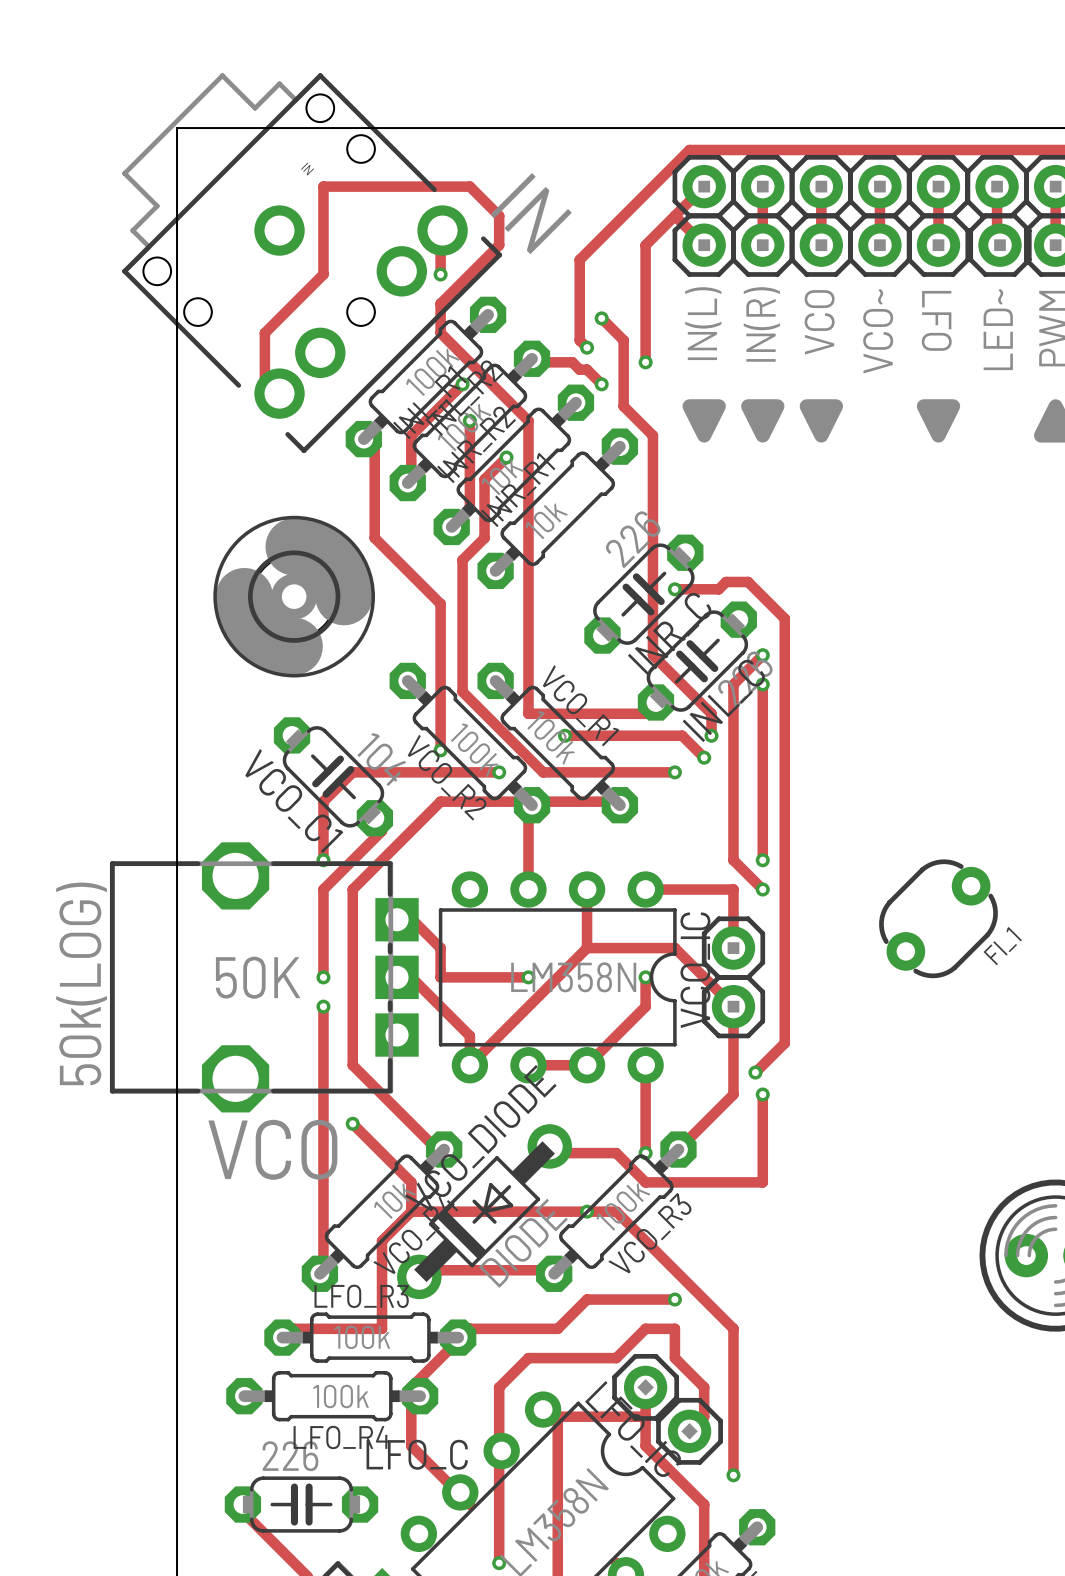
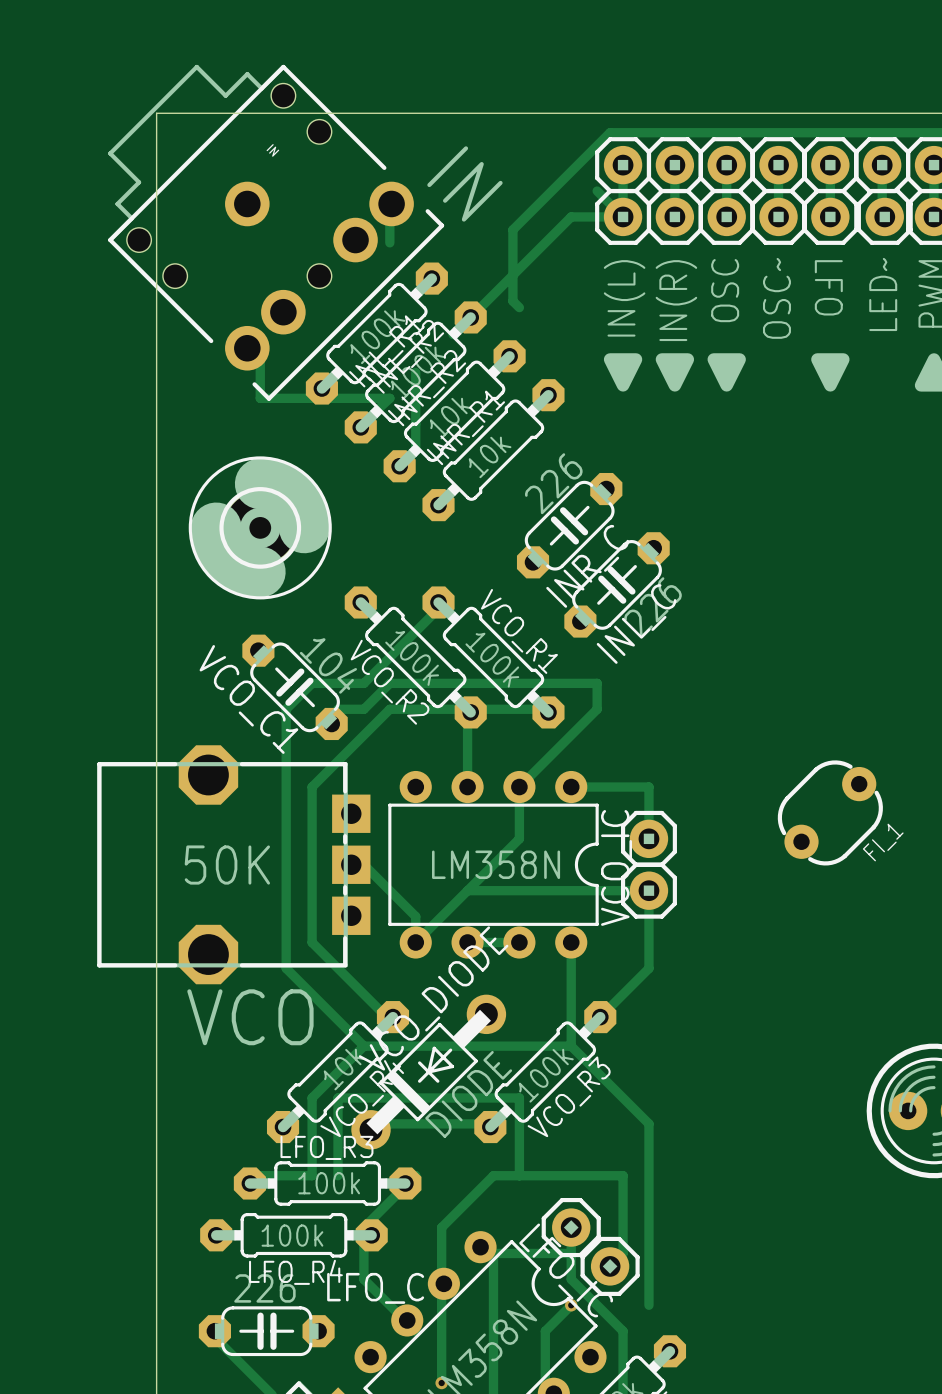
track: (704, 186) (645, 245) (645, 362) -> (623, 165) (623, 216) (571, 216) (452, 334)
via: (440, 274) -> none
track: (601, 318) (623, 340) (623, 406) (652, 435) (652, 655) (711, 713) (711, 735) -> none
via: (601, 318) -> none
part value: VCO (819, 322) -> OSC (725, 290)
part value: VCO~ (878, 331) -> OSC~ (776, 298)
via: (587, 347) -> none
track: (532, 358) (535, 362) (572, 362) (579, 369) (587, 369) (601, 384) -> none
via: (645, 362) -> none
track: (462, 384) (411, 435) (411, 479) (407, 483) -> none
via: (462, 384) -> none
via: (601, 384) -> none
track: (279, 393) (264, 391) (264, 333) (323, 274) (323, 186) (469, 186) (499, 215) (499, 245) (440, 303) (440, 333) (528, 420) (528, 713) (645, 713) (655, 702) -> (247, 348) (260, 346) (260, 398) (389, 398) (379, 407)
via: (469, 420) -> none
track: (363, 439) (374, 450) (374, 538) (440, 603) (440, 750) -> none
track: (506, 457) (484, 479) (484, 538) (462, 560) (462, 691) (543, 772) -> (441, 683) (480, 683)
via: (506, 457) -> none
track: (674, 589) (718, 589) (726, 581) (748, 581) (784, 618) (784, 1043) (755, 1072) -> none
via: (674, 589) -> none
track: (762, 655) (733, 684) (733, 860) (762, 889) -> none
via: (762, 655) -> none
track: none -> (438, 602) (441, 605) (363, 683)
track: (762, 684) (762, 860) -> none
via: (762, 684) -> none
track: (565, 735) (682, 735) (704, 757) -> none
via: (565, 735) -> none
via: (711, 735) -> none
via: (440, 750) -> none
via: (704, 757) -> none
track: (411, 772) (440, 772) -> (331, 723) (338, 709) (363, 709) (389, 683)
via: (499, 772) -> none
track: none -> (597, 683) (597, 709) (519, 787)
via: (674, 772) -> none
track: (374, 818) (382, 830) (323, 889) -> (286, 761) (286, 787)
via: (323, 860) -> none
via: (762, 860) -> none
via: (762, 889) -> none
track: (397, 919) (411, 918) (440, 948) (440, 977) (528, 977) -> none
track: (587, 948) (674, 948) (733, 1006) -> (467, 890) (648, 890)
via: (323, 977) -> none
via: (528, 977) -> none
track: (645, 977) (645, 1006) (587, 1065) -> none
via: (645, 977) -> none
part value: 50k(LOG) (81, 983) -> none
via: (323, 1006) -> none
via: (755, 1072) -> none
track: (323, 1094) (323, 1270) (319, 1273) -> (286, 968) (312, 994)
track: (762, 1094) (762, 1182) (645, 1182) (616, 1153) (557, 1153) (549, 1146) -> none
via: (762, 1094) -> none
via: (352, 1123) -> none
track: none -> (571, 1020) (571, 1046)
via: (645, 1153) -> none
track: (411, 1182) (411, 1211) -> (286, 864) (286, 890)
track: (411, 1211) (382, 1240) -> (519, 1175) (519, 1097) (338, 1097)
track: (411, 1211) (616, 1211) (733, 1328) -> (571, 1046) (648, 1123) (648, 1175)
via: (587, 1211) -> none
track: (674, 1299) (587, 1299) (557, 1328) (469, 1328) -> none
via: (674, 1299) -> none
track: (352, 1328) (382, 1328) -> (312, 1175) (312, 1097) (363, 1046) (571, 1046)
track: (645, 1328) (616, 1358) (528, 1358) -> (571, 1175) (493, 1175) (467, 1201)
track: (674, 1328) (674, 1358) (704, 1387) -> (597, 1175) (623, 1175) (623, 1227)
track: none -> (571, 1305) (545, 1331) (545, 1383)
via: none -> (571, 1305)
via: (733, 1475) -> none

